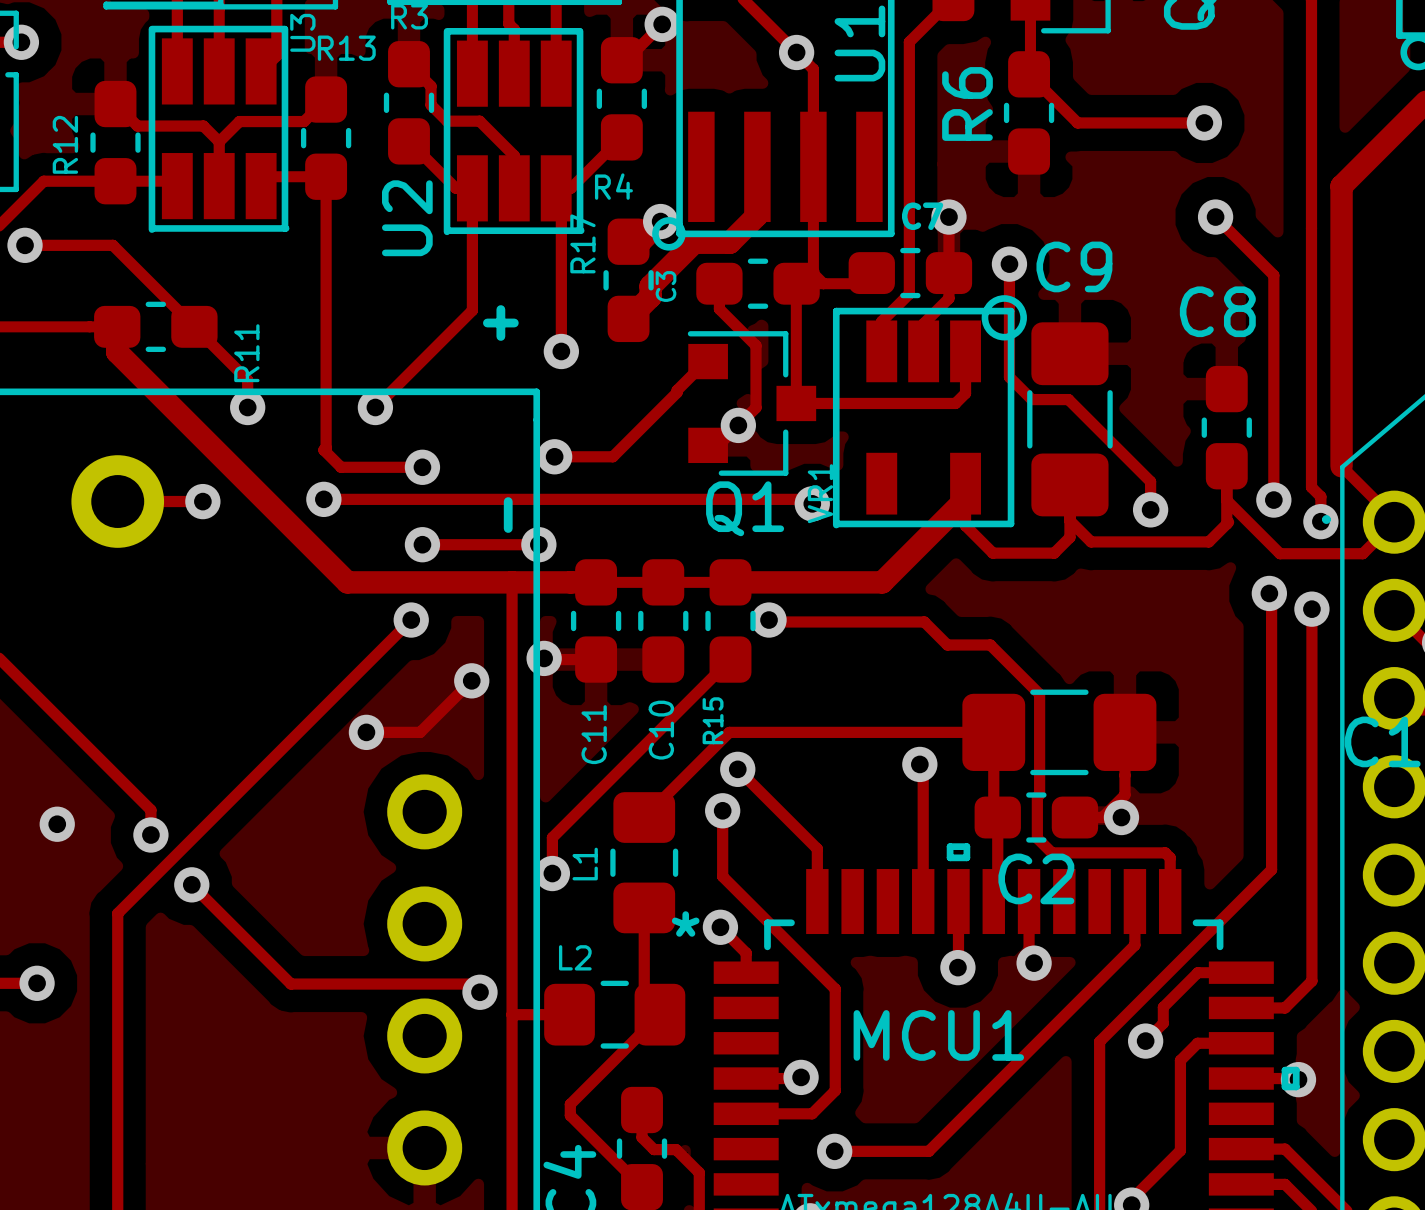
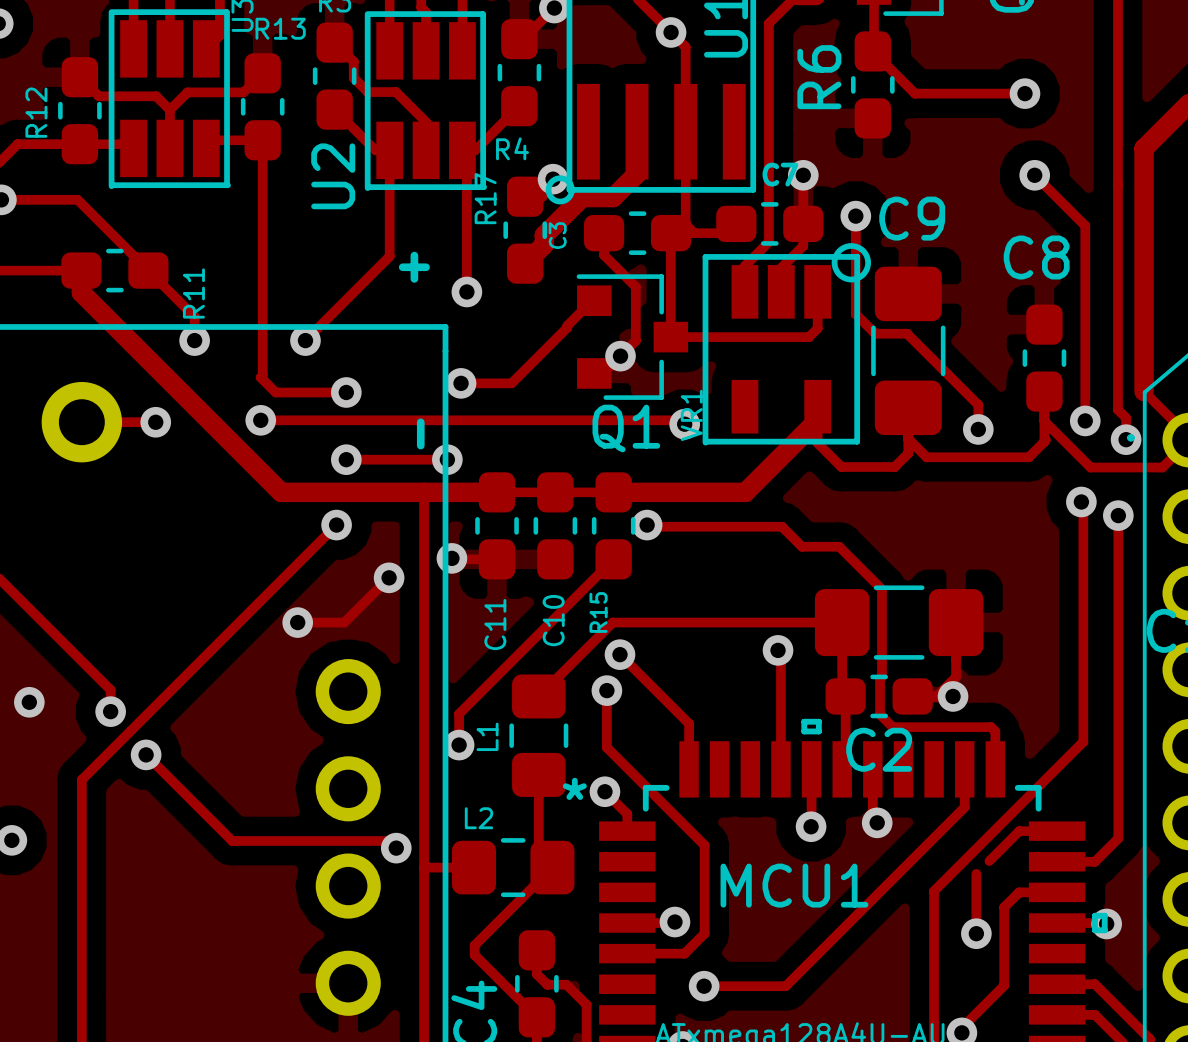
track: (1163, 1007) (1163, 1023) (1145, 1041) -> none
track: none -> (976, 873) (976, 933)
via position: (1145, 1041) -> (976, 933)

